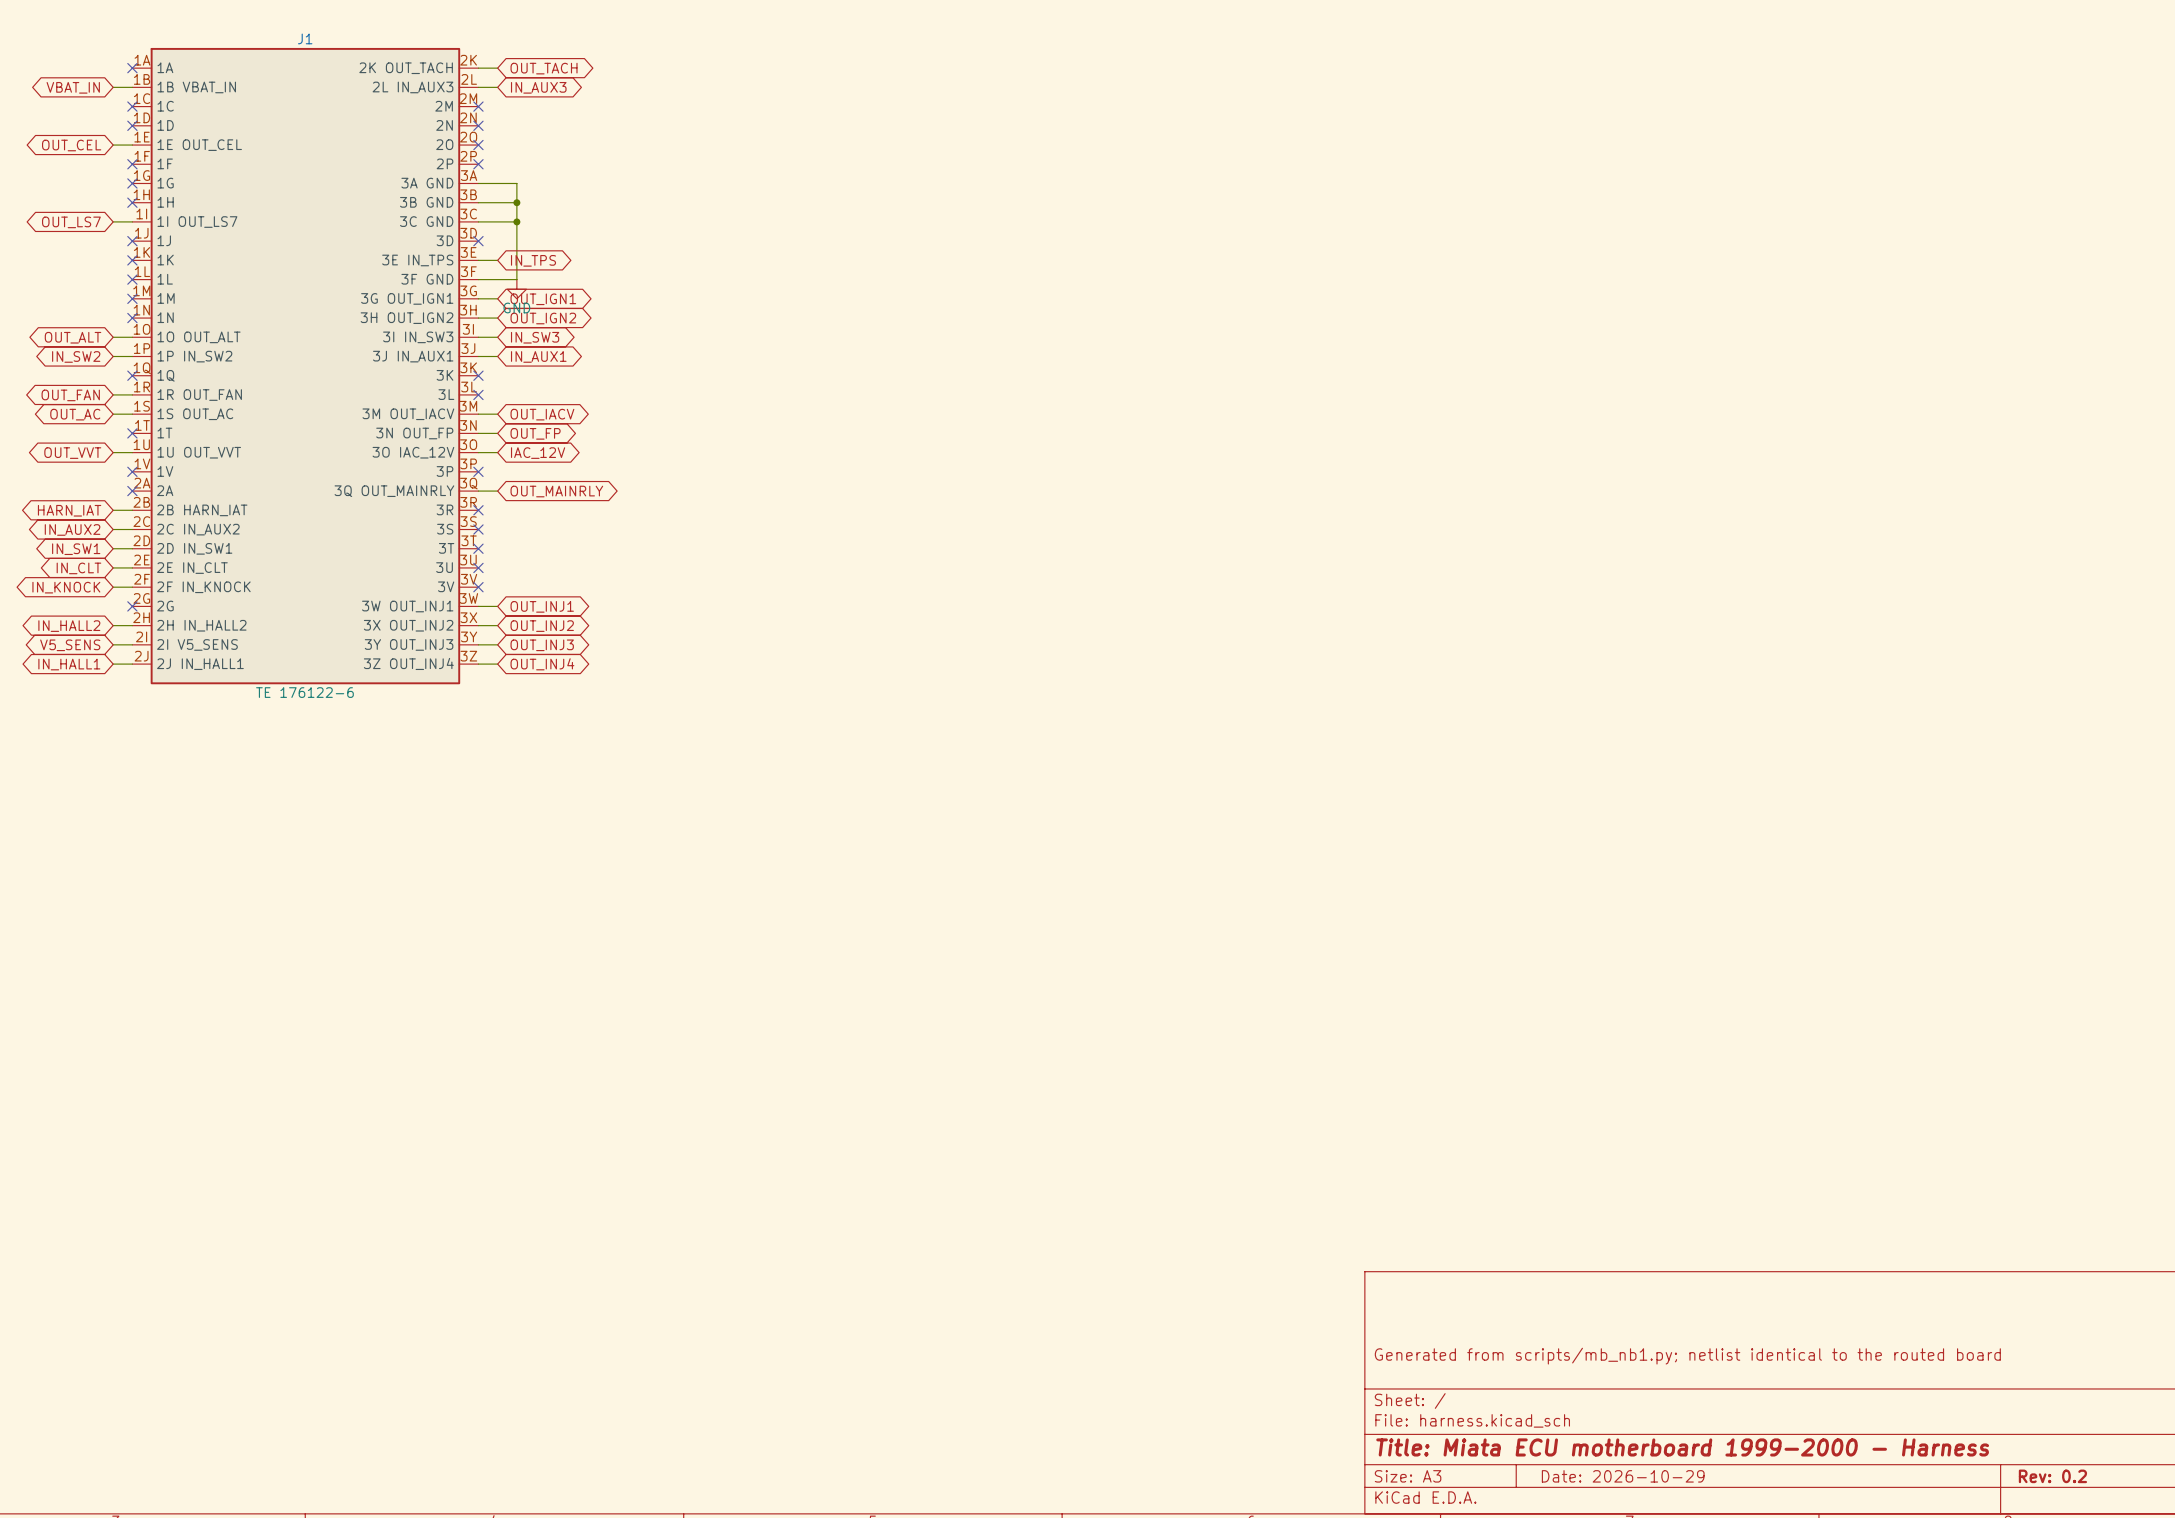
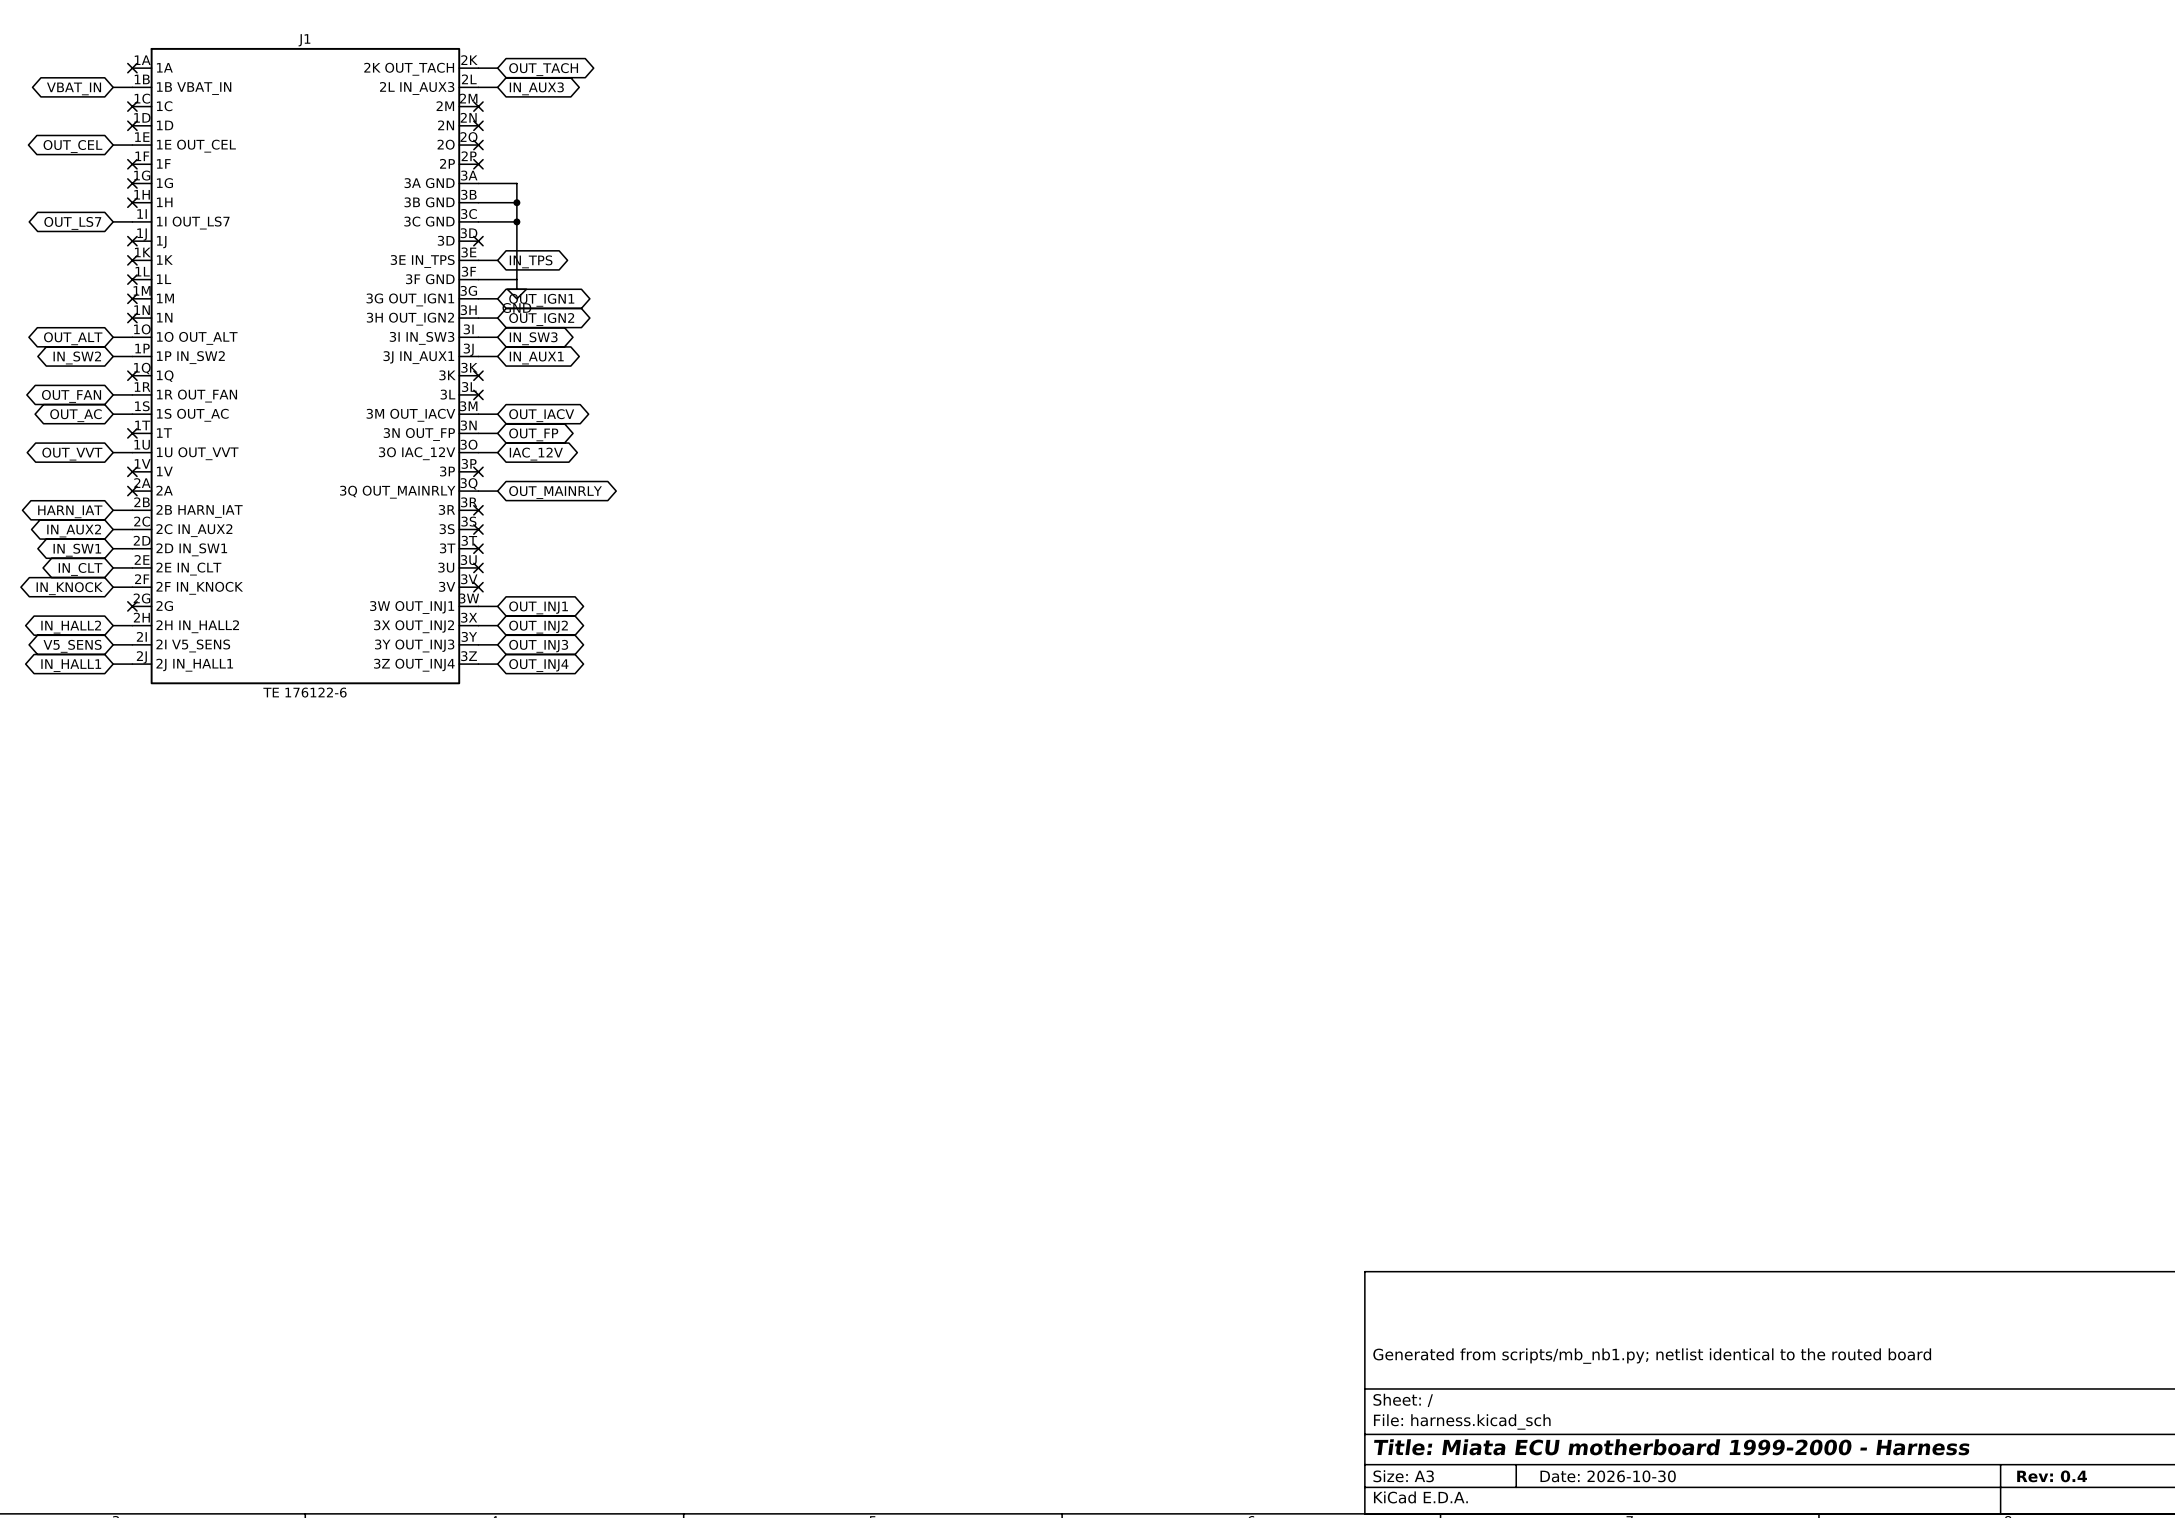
title block: Date: 2026-10-29 (1623, 1476) -> Date: 2026-10-30 (1608, 1476)
title block: Rev: 0.2 (2052, 1476) -> Rev: 0.4 (2052, 1476)

